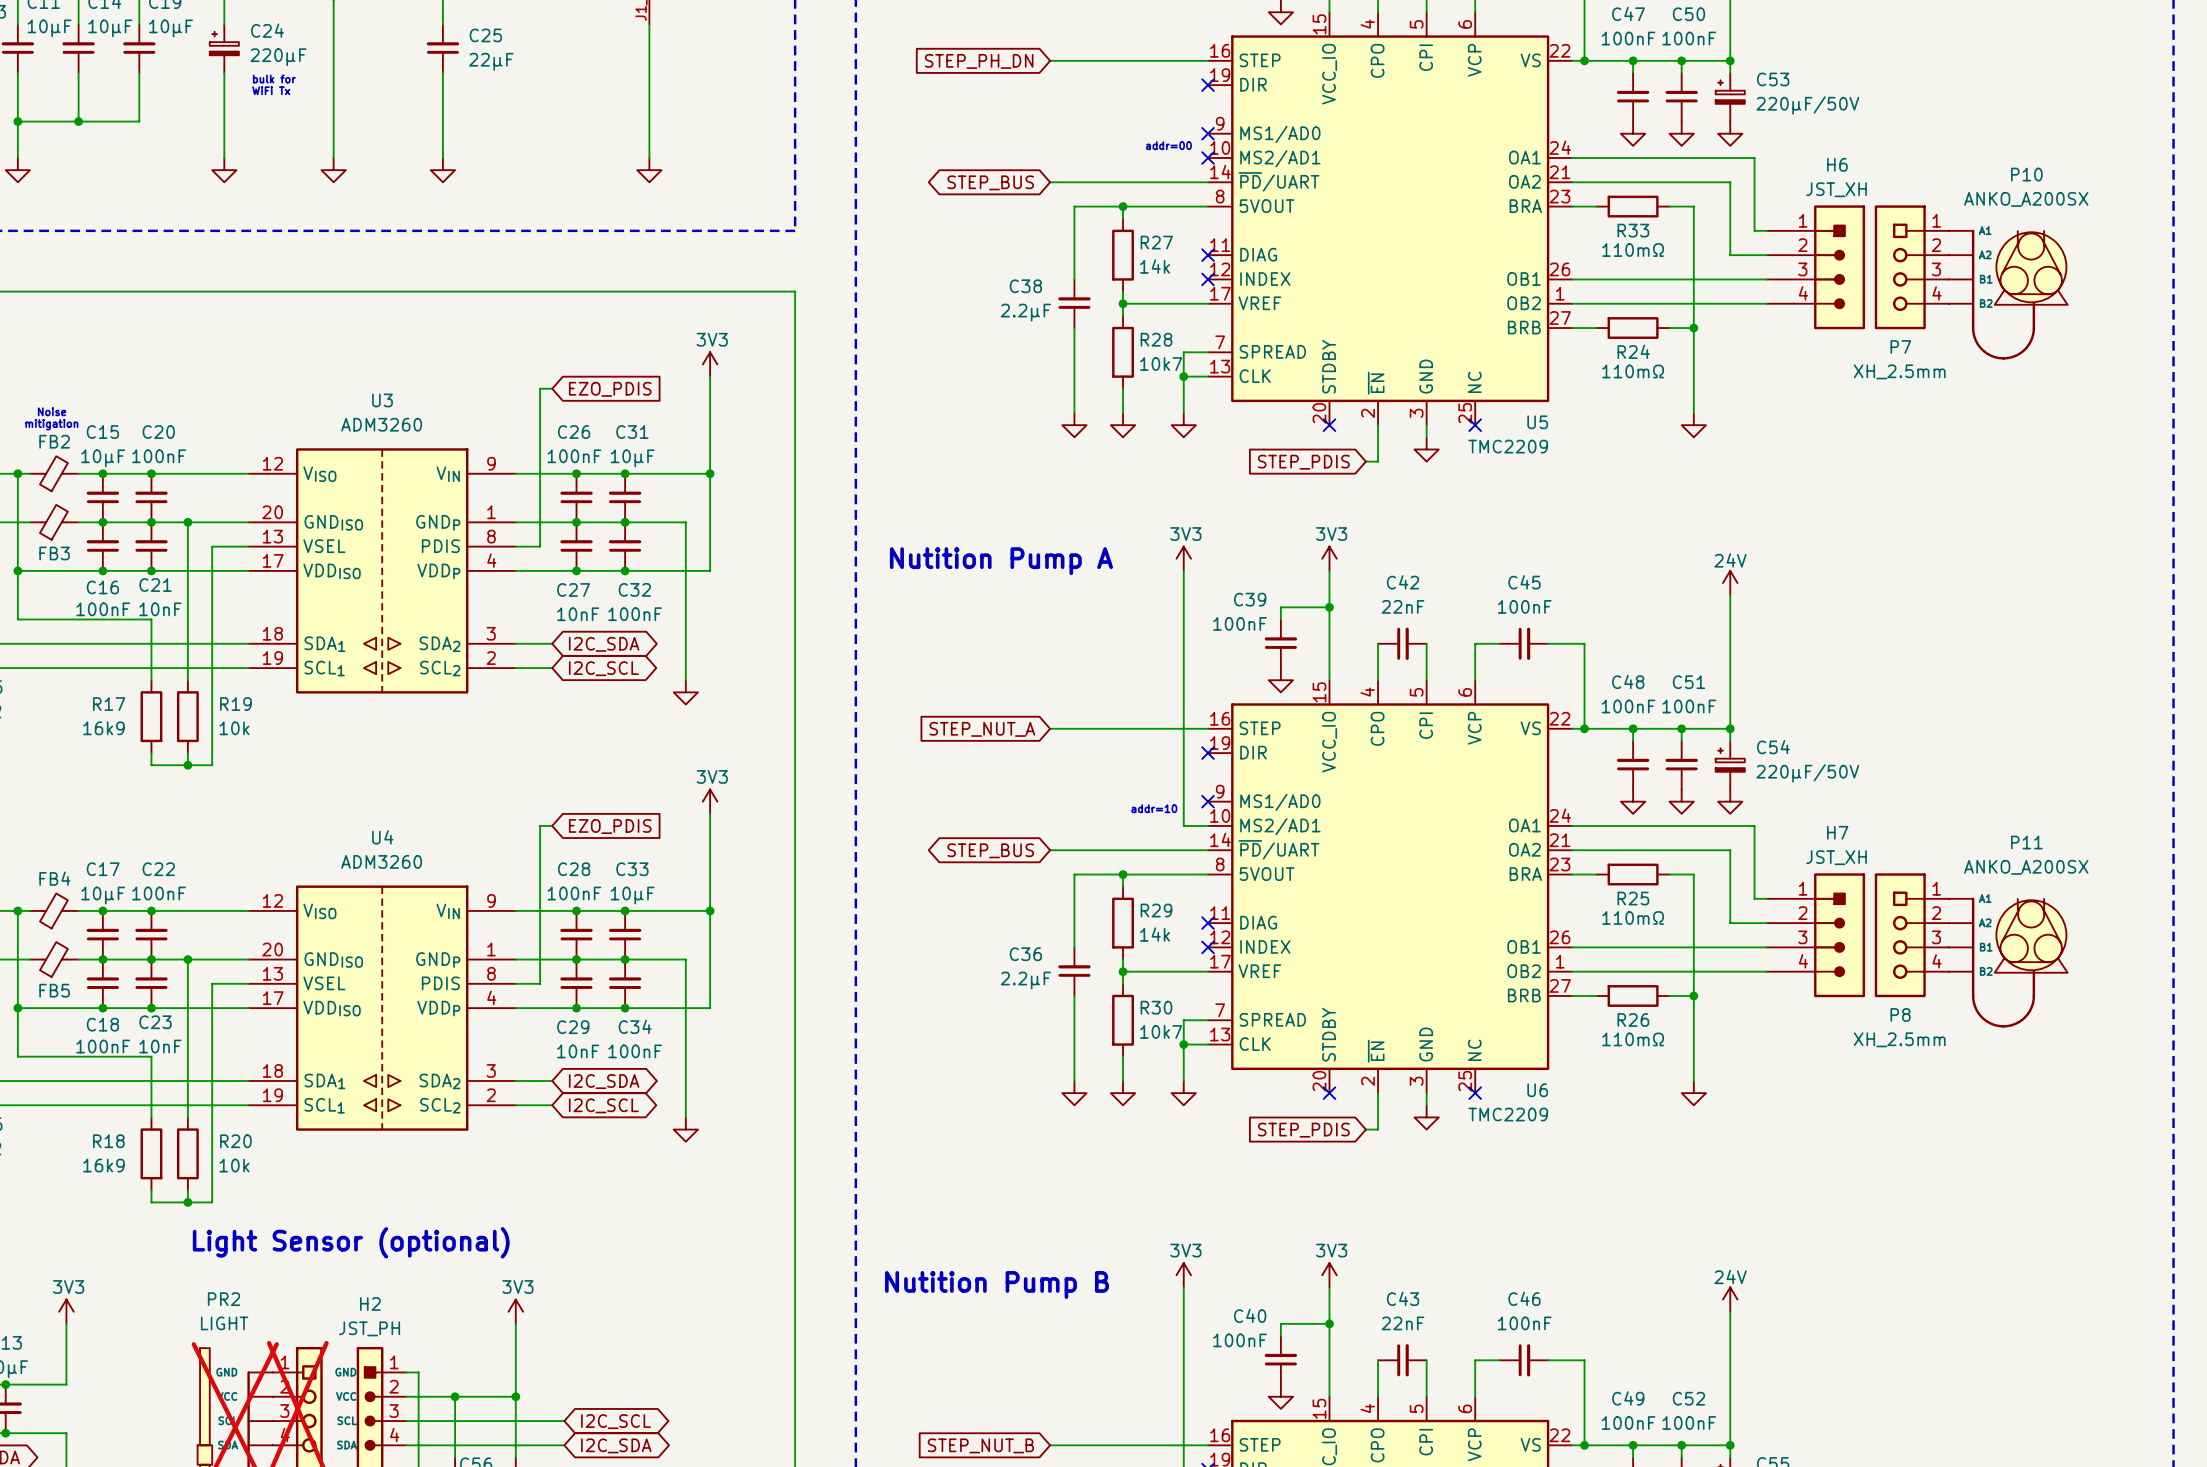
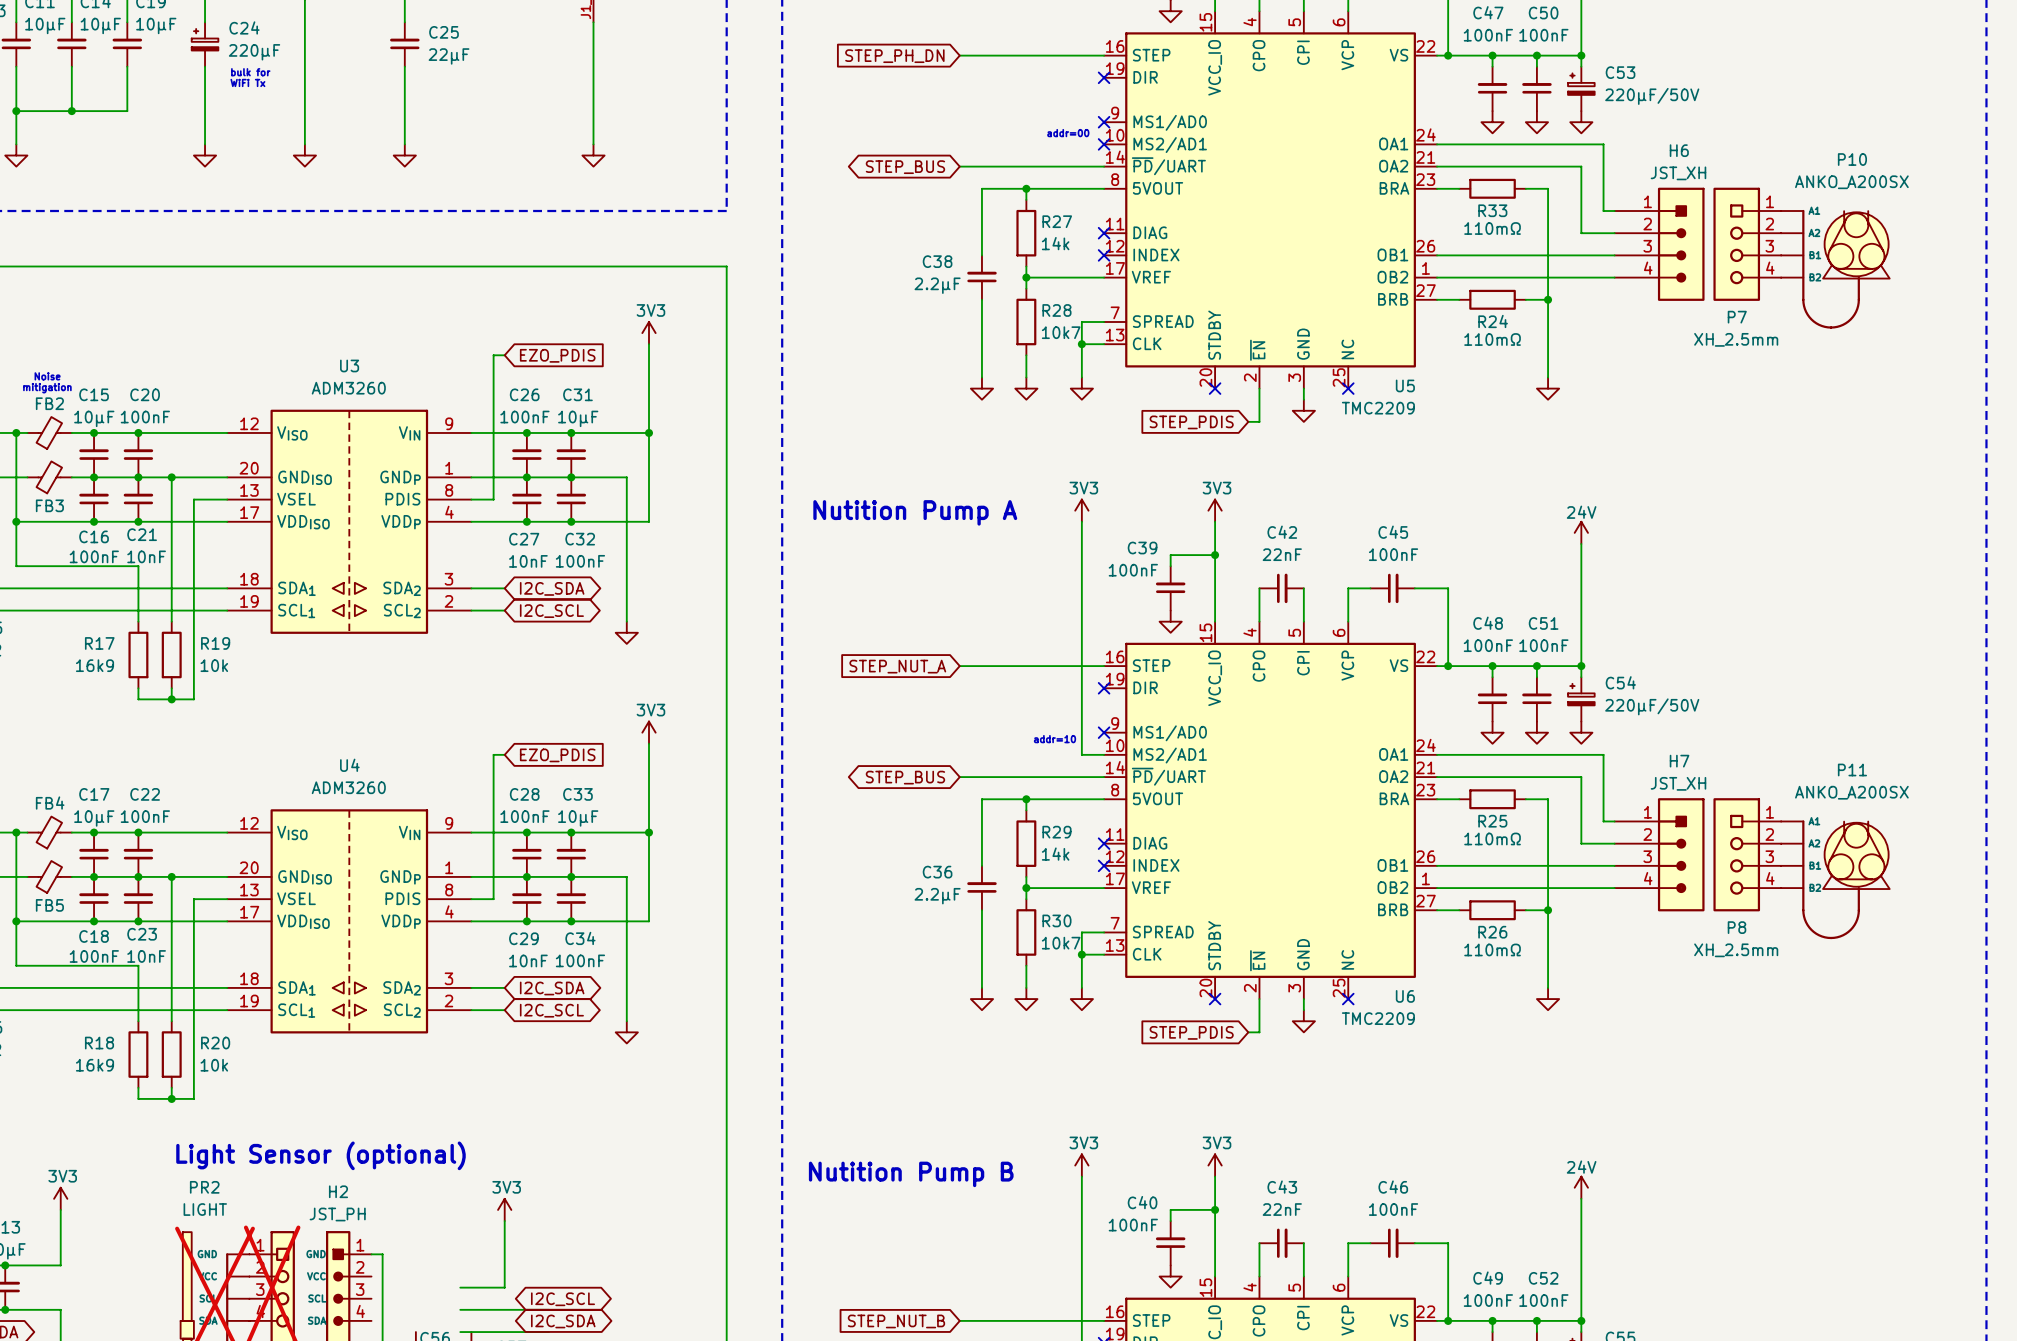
text position: Light Sensor (optional) (351, 1242) -> Light Sensor (optional) (320, 1155)
power symbol position: 3V3 (515, 1311) -> 3V3 (504, 1209)
wire: (515, 1323) (515, 1457) -> none
wire: none -> (504, 1221) (504, 1287) (460, 1287)
wire: (406, 1396) (515, 1396) -> none
wire: (455, 1396) (455, 1457) -> none
junction: (455, 1396) -> none
junction: (515, 1396) -> none
wire: (406, 1421) (564, 1421) -> none
wire: none -> (460, 1309) (549, 1309)
wire: (406, 1445) (564, 1445) -> none
wire: none -> (460, 1332) (549, 1332)

